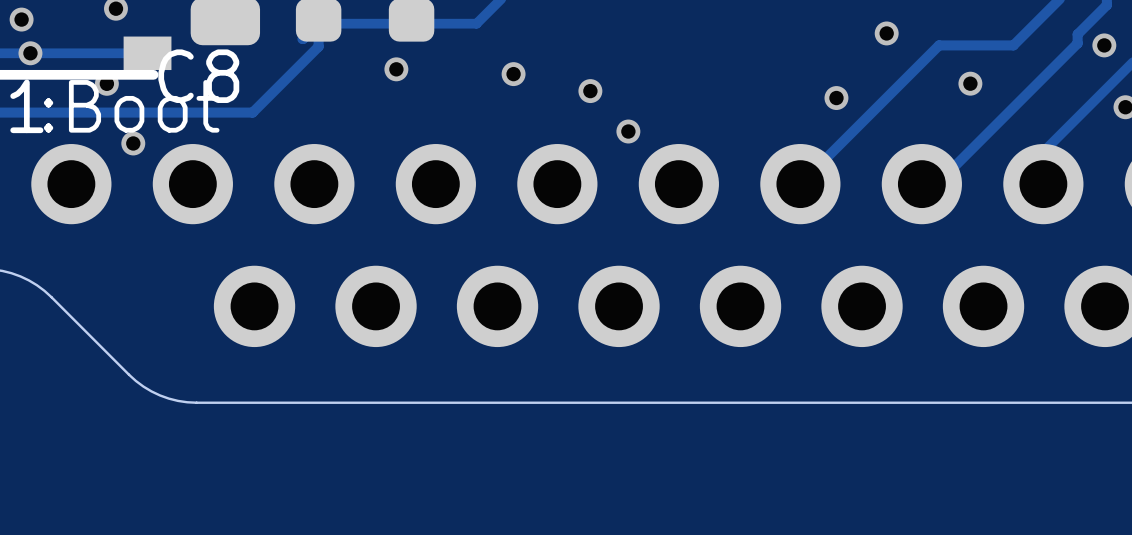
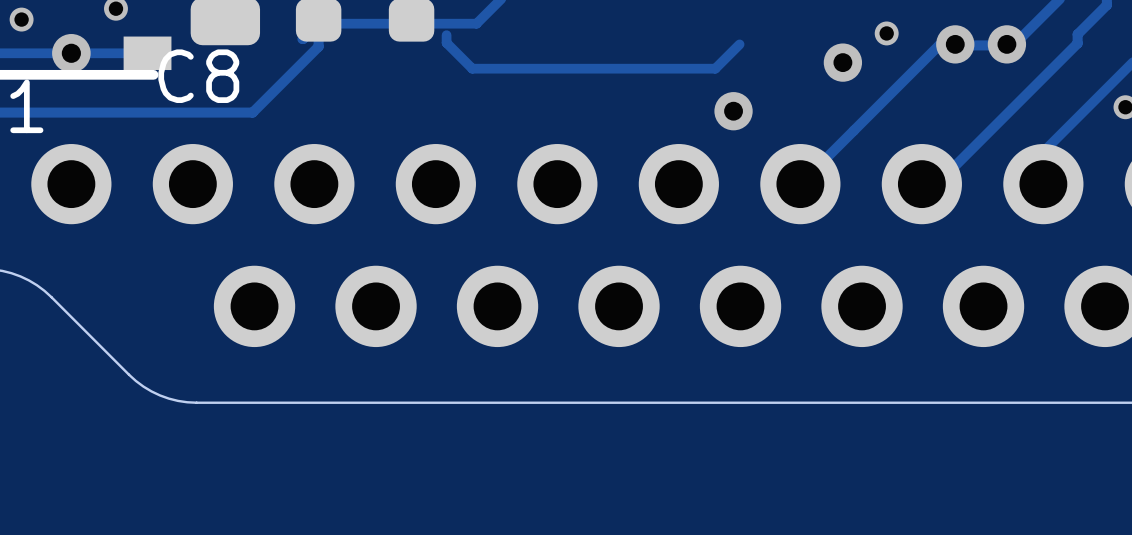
track: none -> (446, 35) (446, 42) (472, 68) (715, 68) (739, 44)
via: none -> (955, 44)
via: none -> (1006, 44)
via: (1104, 45) -> none
via: (30, 53) -> none
via: none -> (71, 53)
via: none -> (842, 62)
via: (396, 69) -> none
via: (513, 74) -> none
via: (106, 83) -> none
via: (970, 83) -> none
via: (590, 91) -> none
via: (836, 98) -> none
text: :Boot (131, 106) -> none
via: none -> (733, 111)
via: (628, 131) -> none
via: (133, 143) -> none

